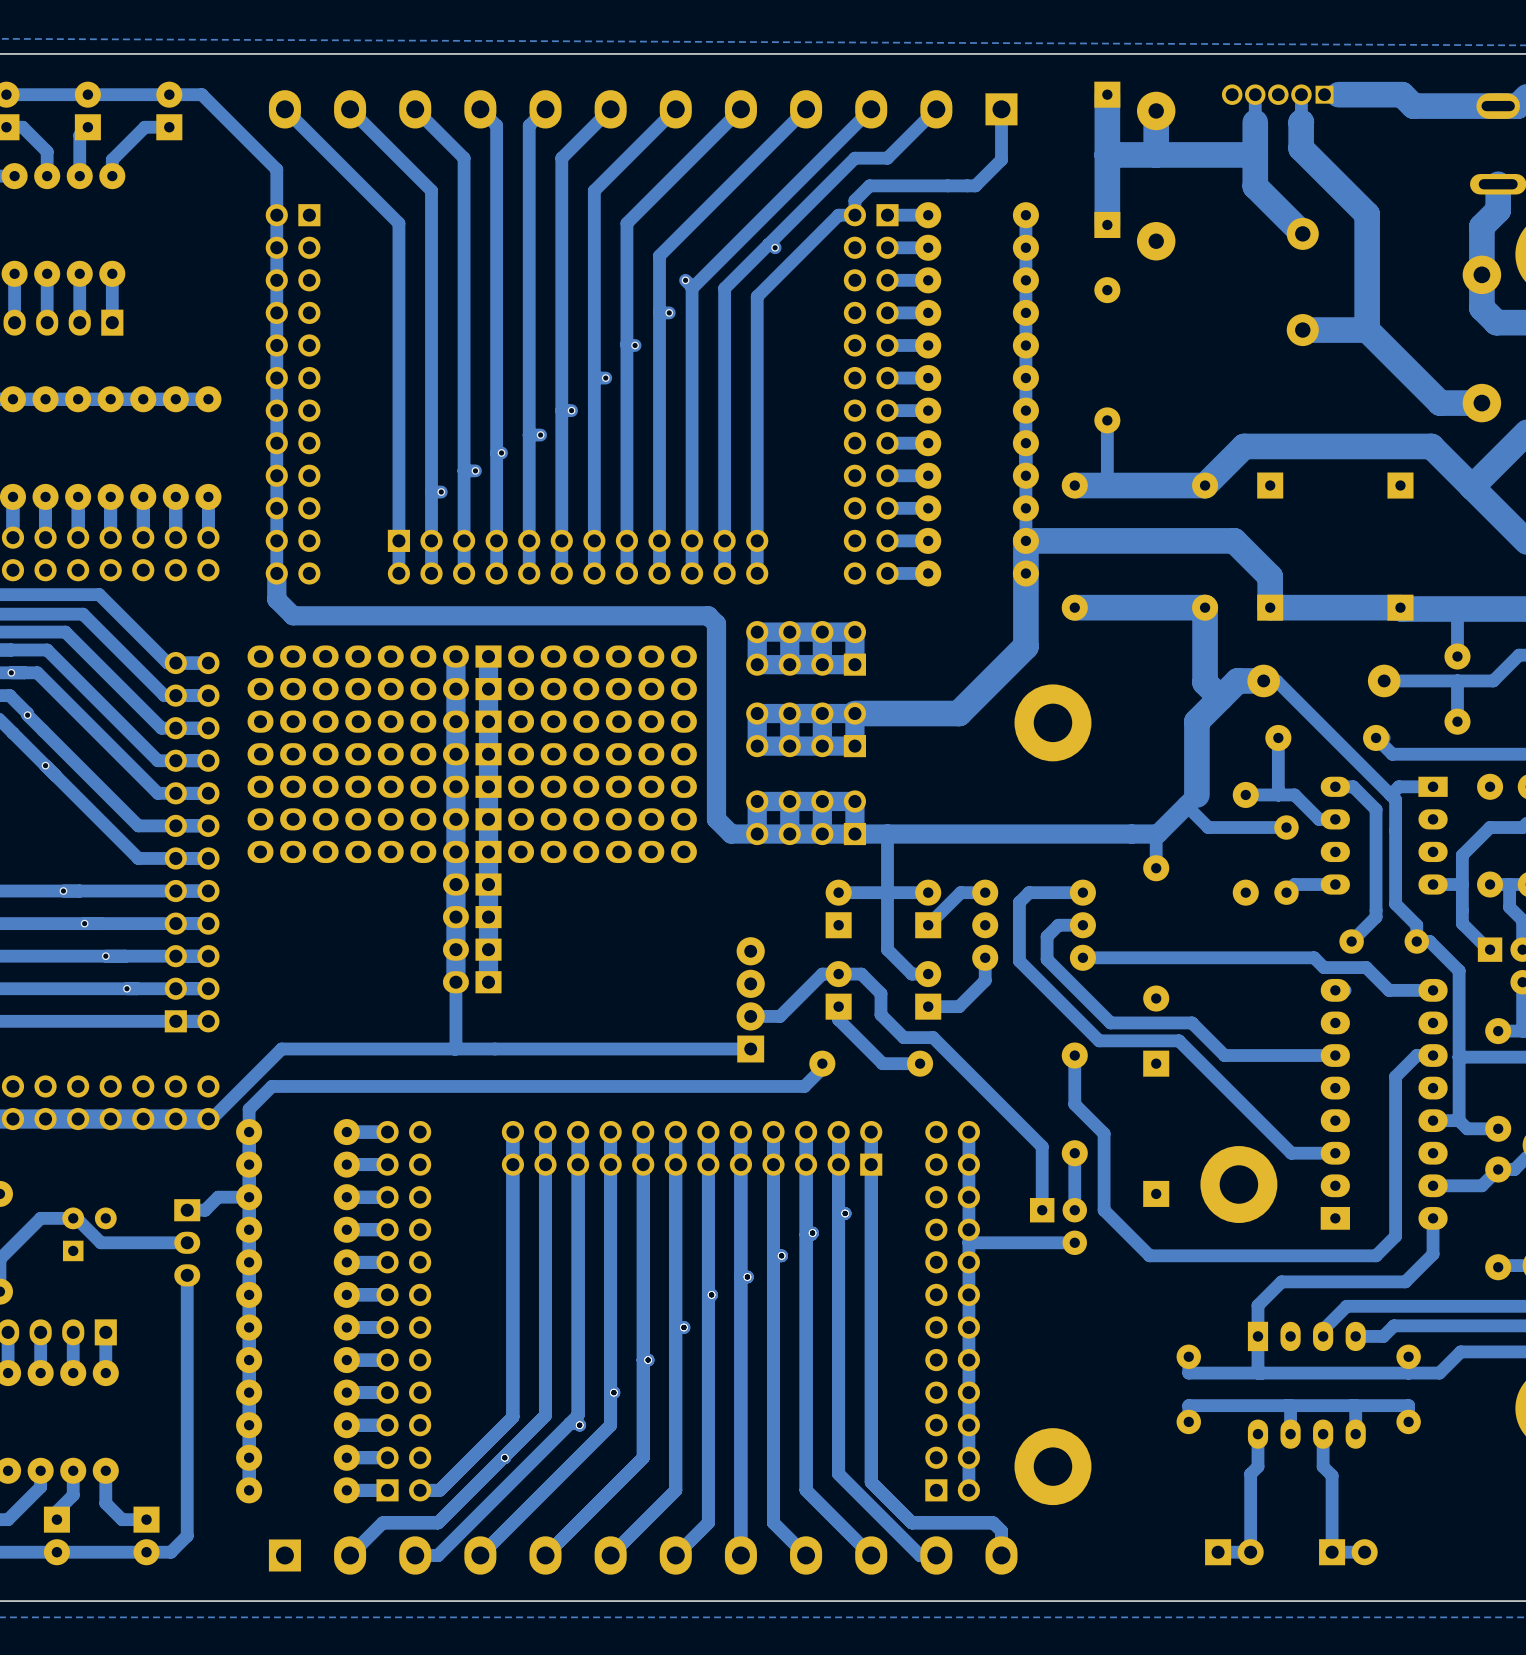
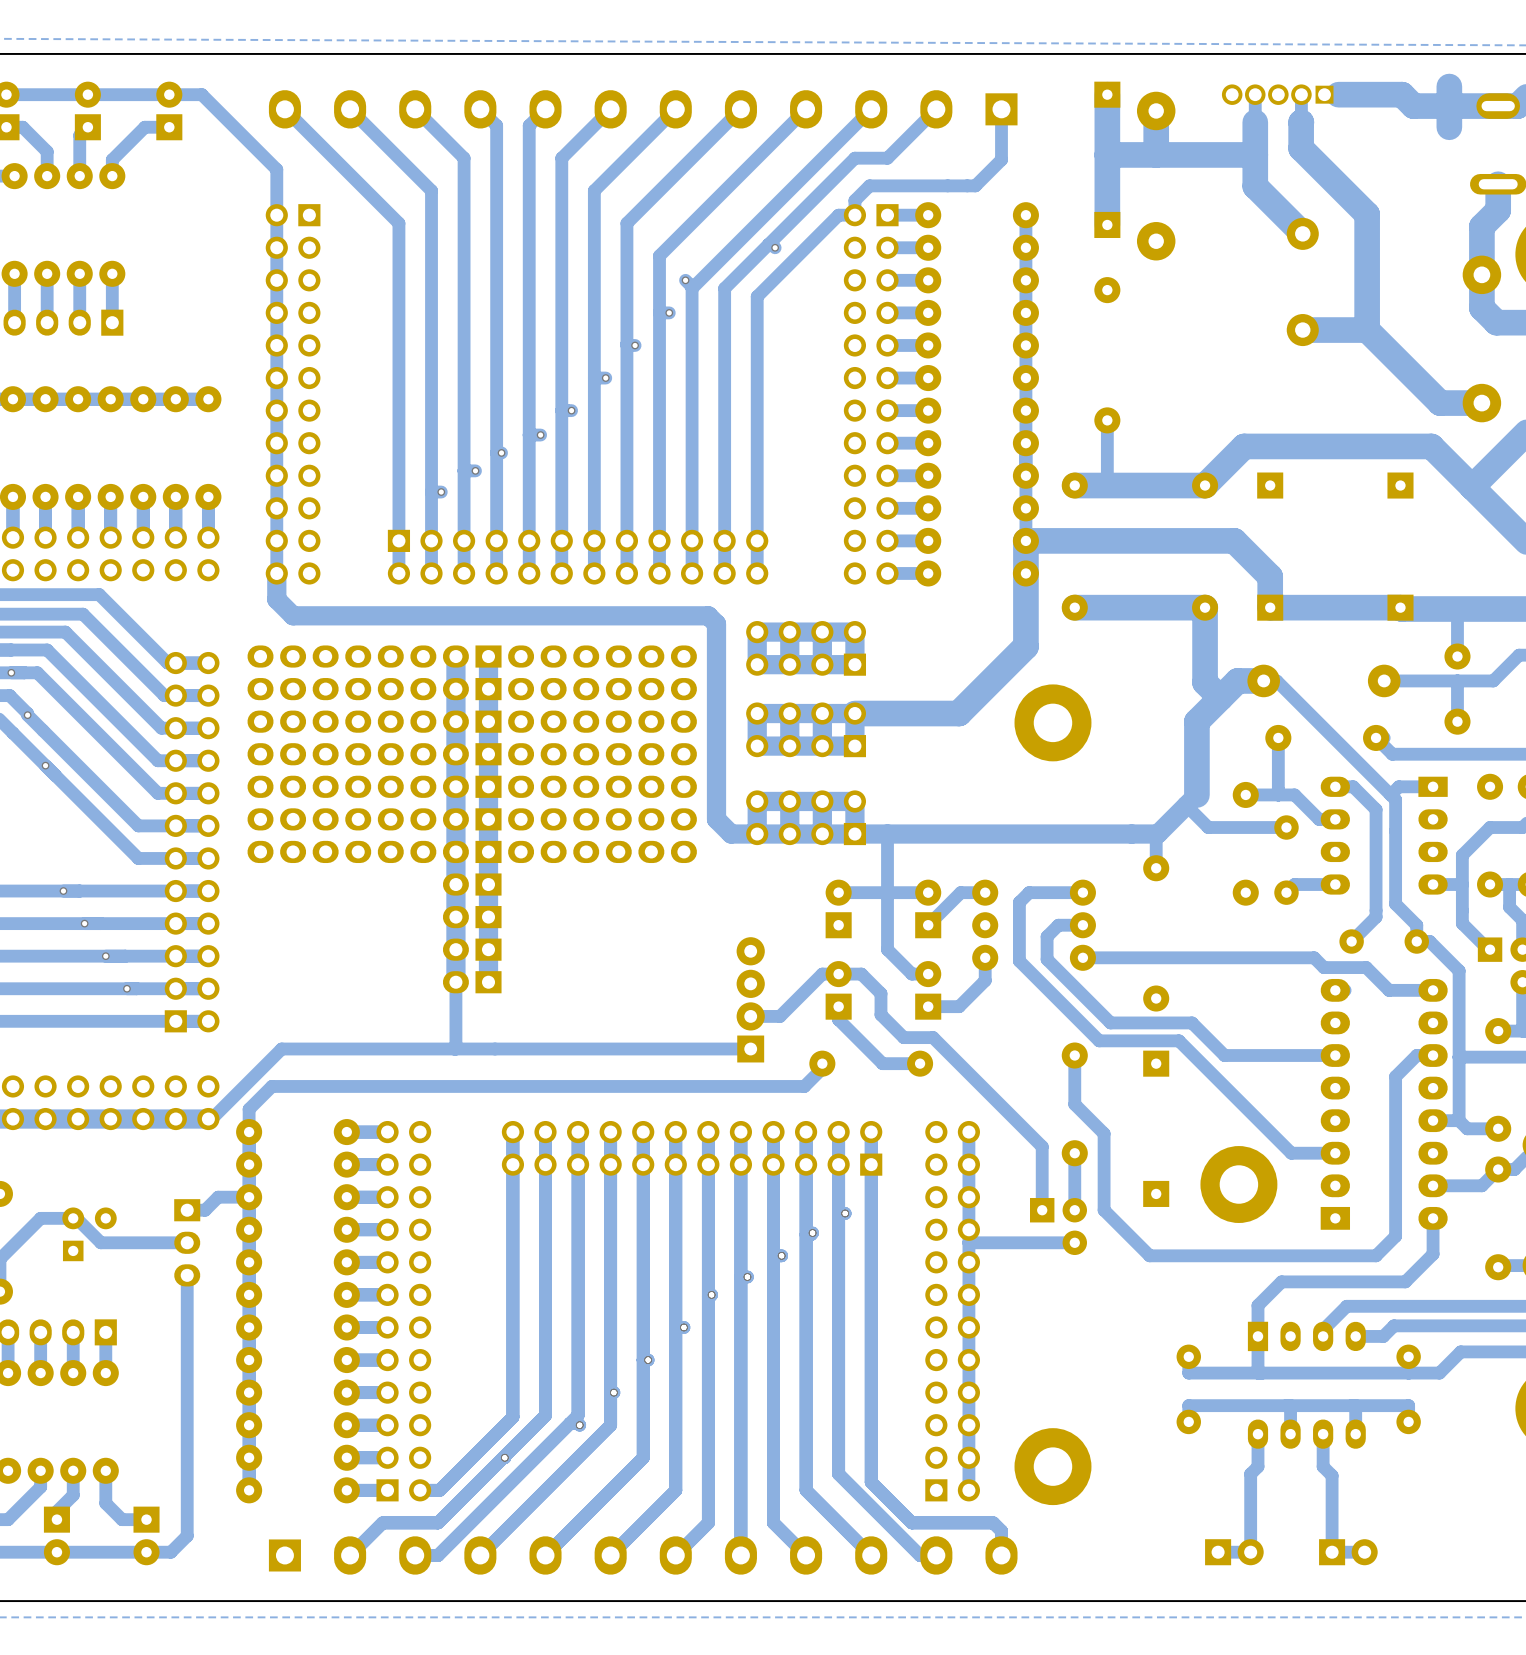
track: none -> (1449, 86) (1449, 127)

